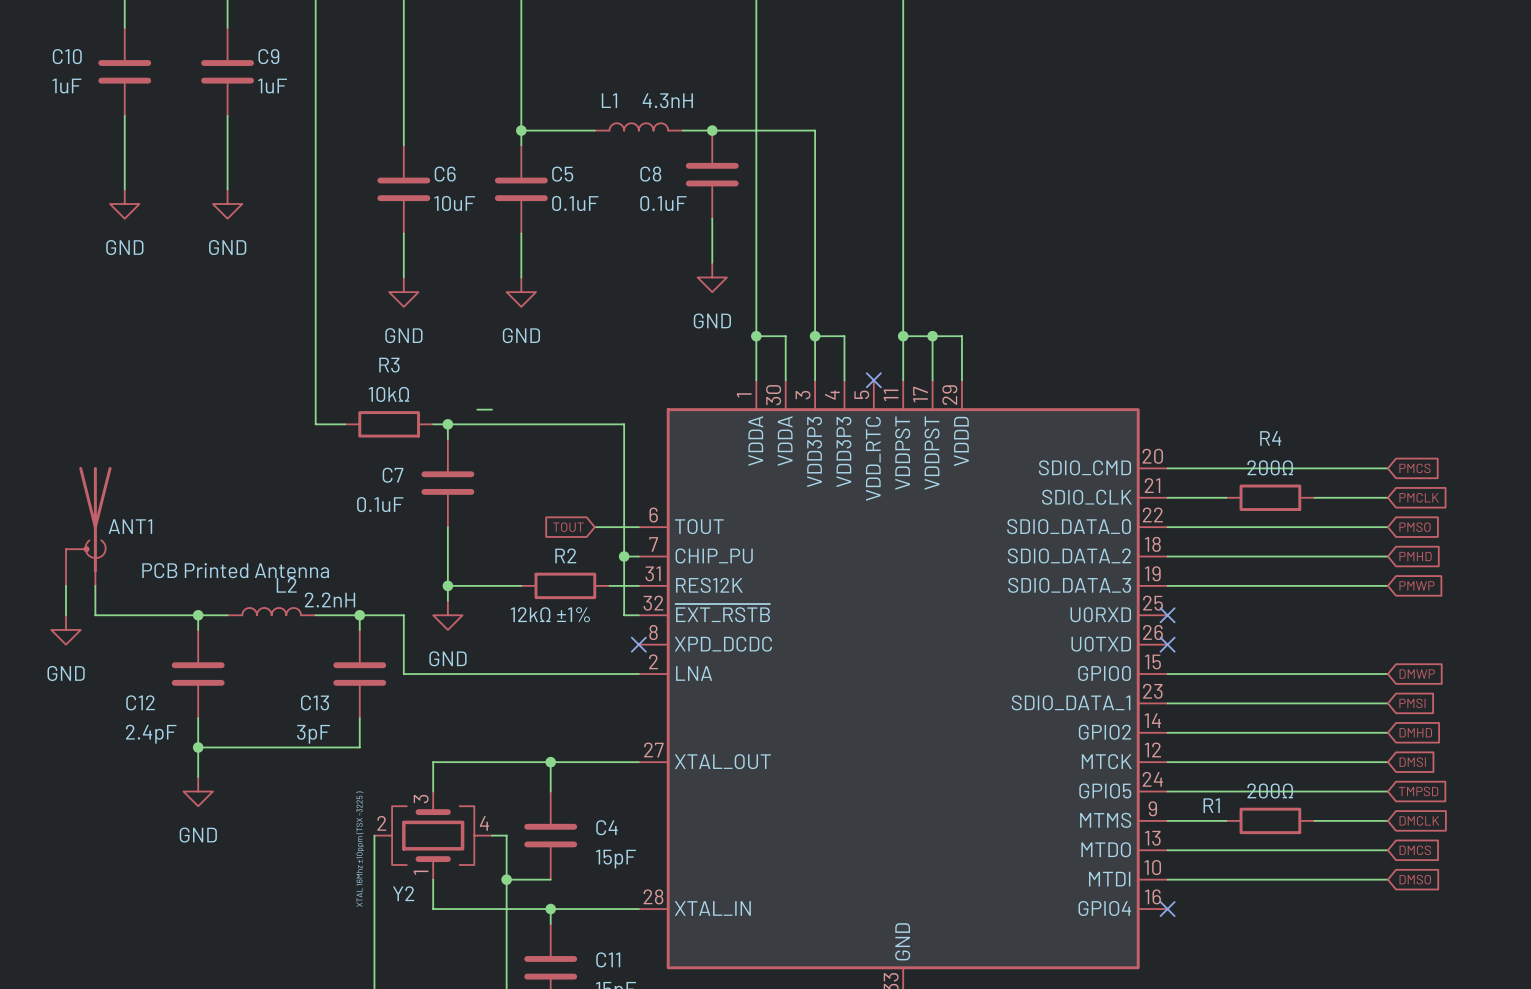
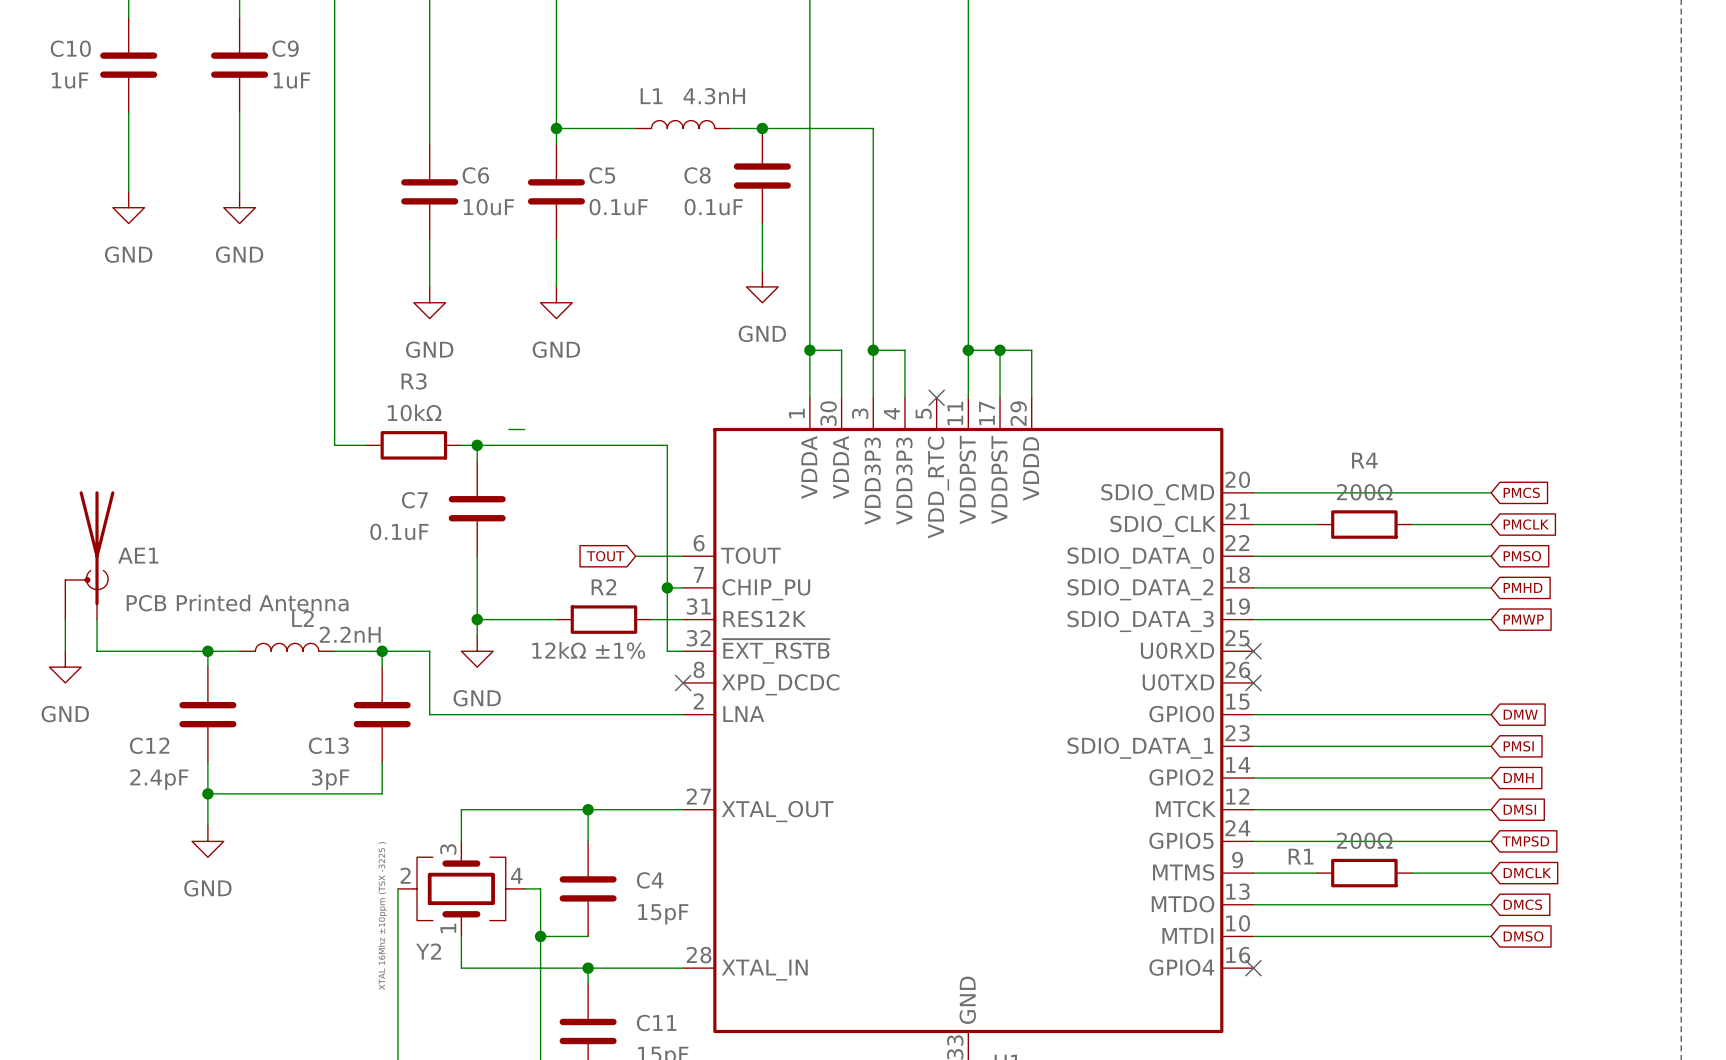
ANT1 name: ANT1 (130, 526) -> AE1 (138, 555)
global label: DMWP (1417, 674) -> DMW (1520, 714)
global label: DMHD (1415, 732) -> DMH (1518, 778)

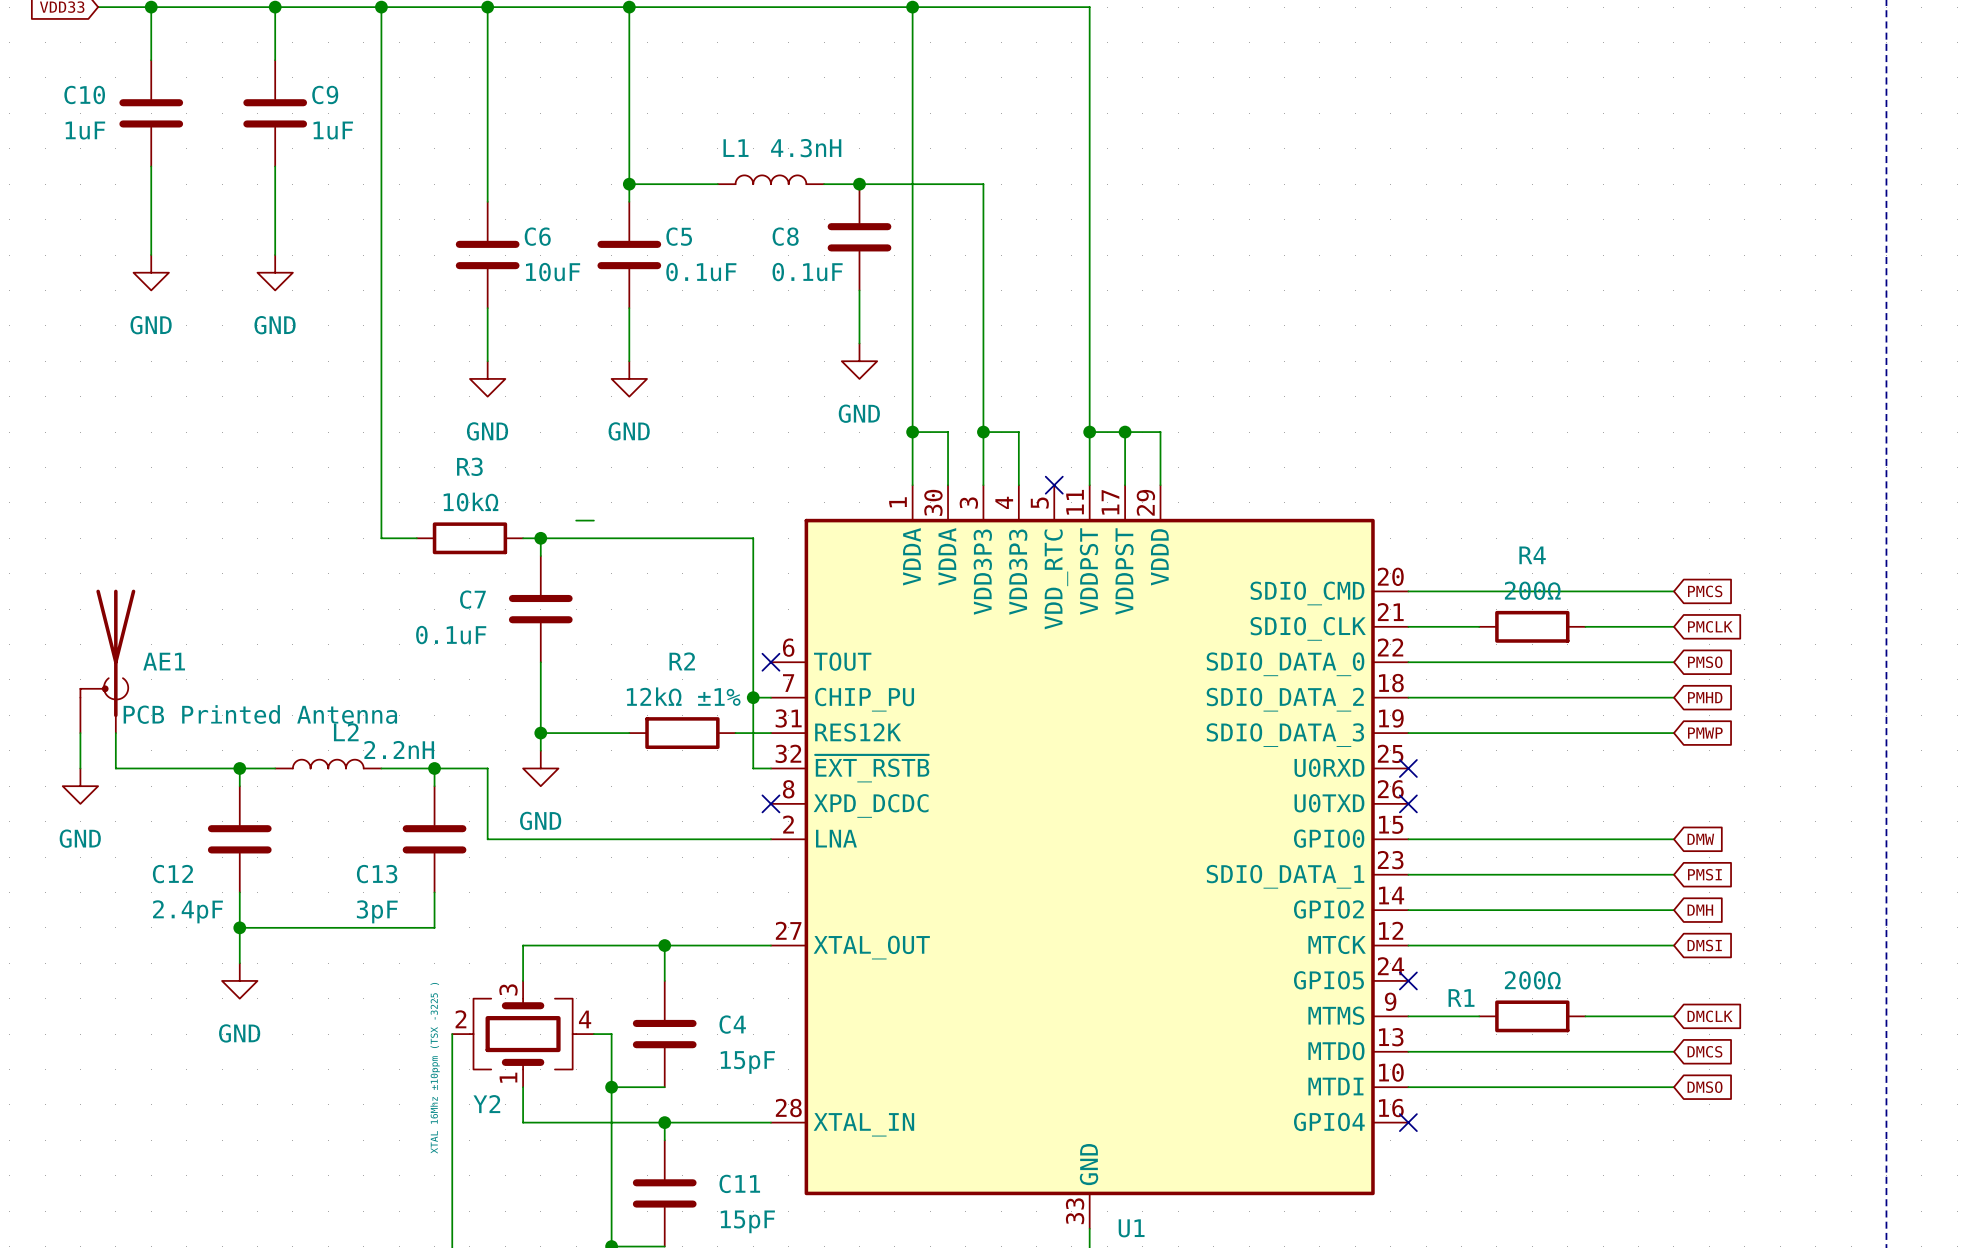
global label: TOUT (605, 556) -> none
wire: (635, 556) (683, 556) -> none
no-connect mark: none -> (770, 662)
R2 name position: R2 (603, 587) -> R2 (682, 661)
R2 value position: 12kΩ ±1% (588, 650) -> 12kΩ ±1% (683, 696)
wire: (1253, 841) (1491, 841) -> none
no-connect mark: none -> (1408, 980)
global label: TMPSD (1525, 841) -> none

